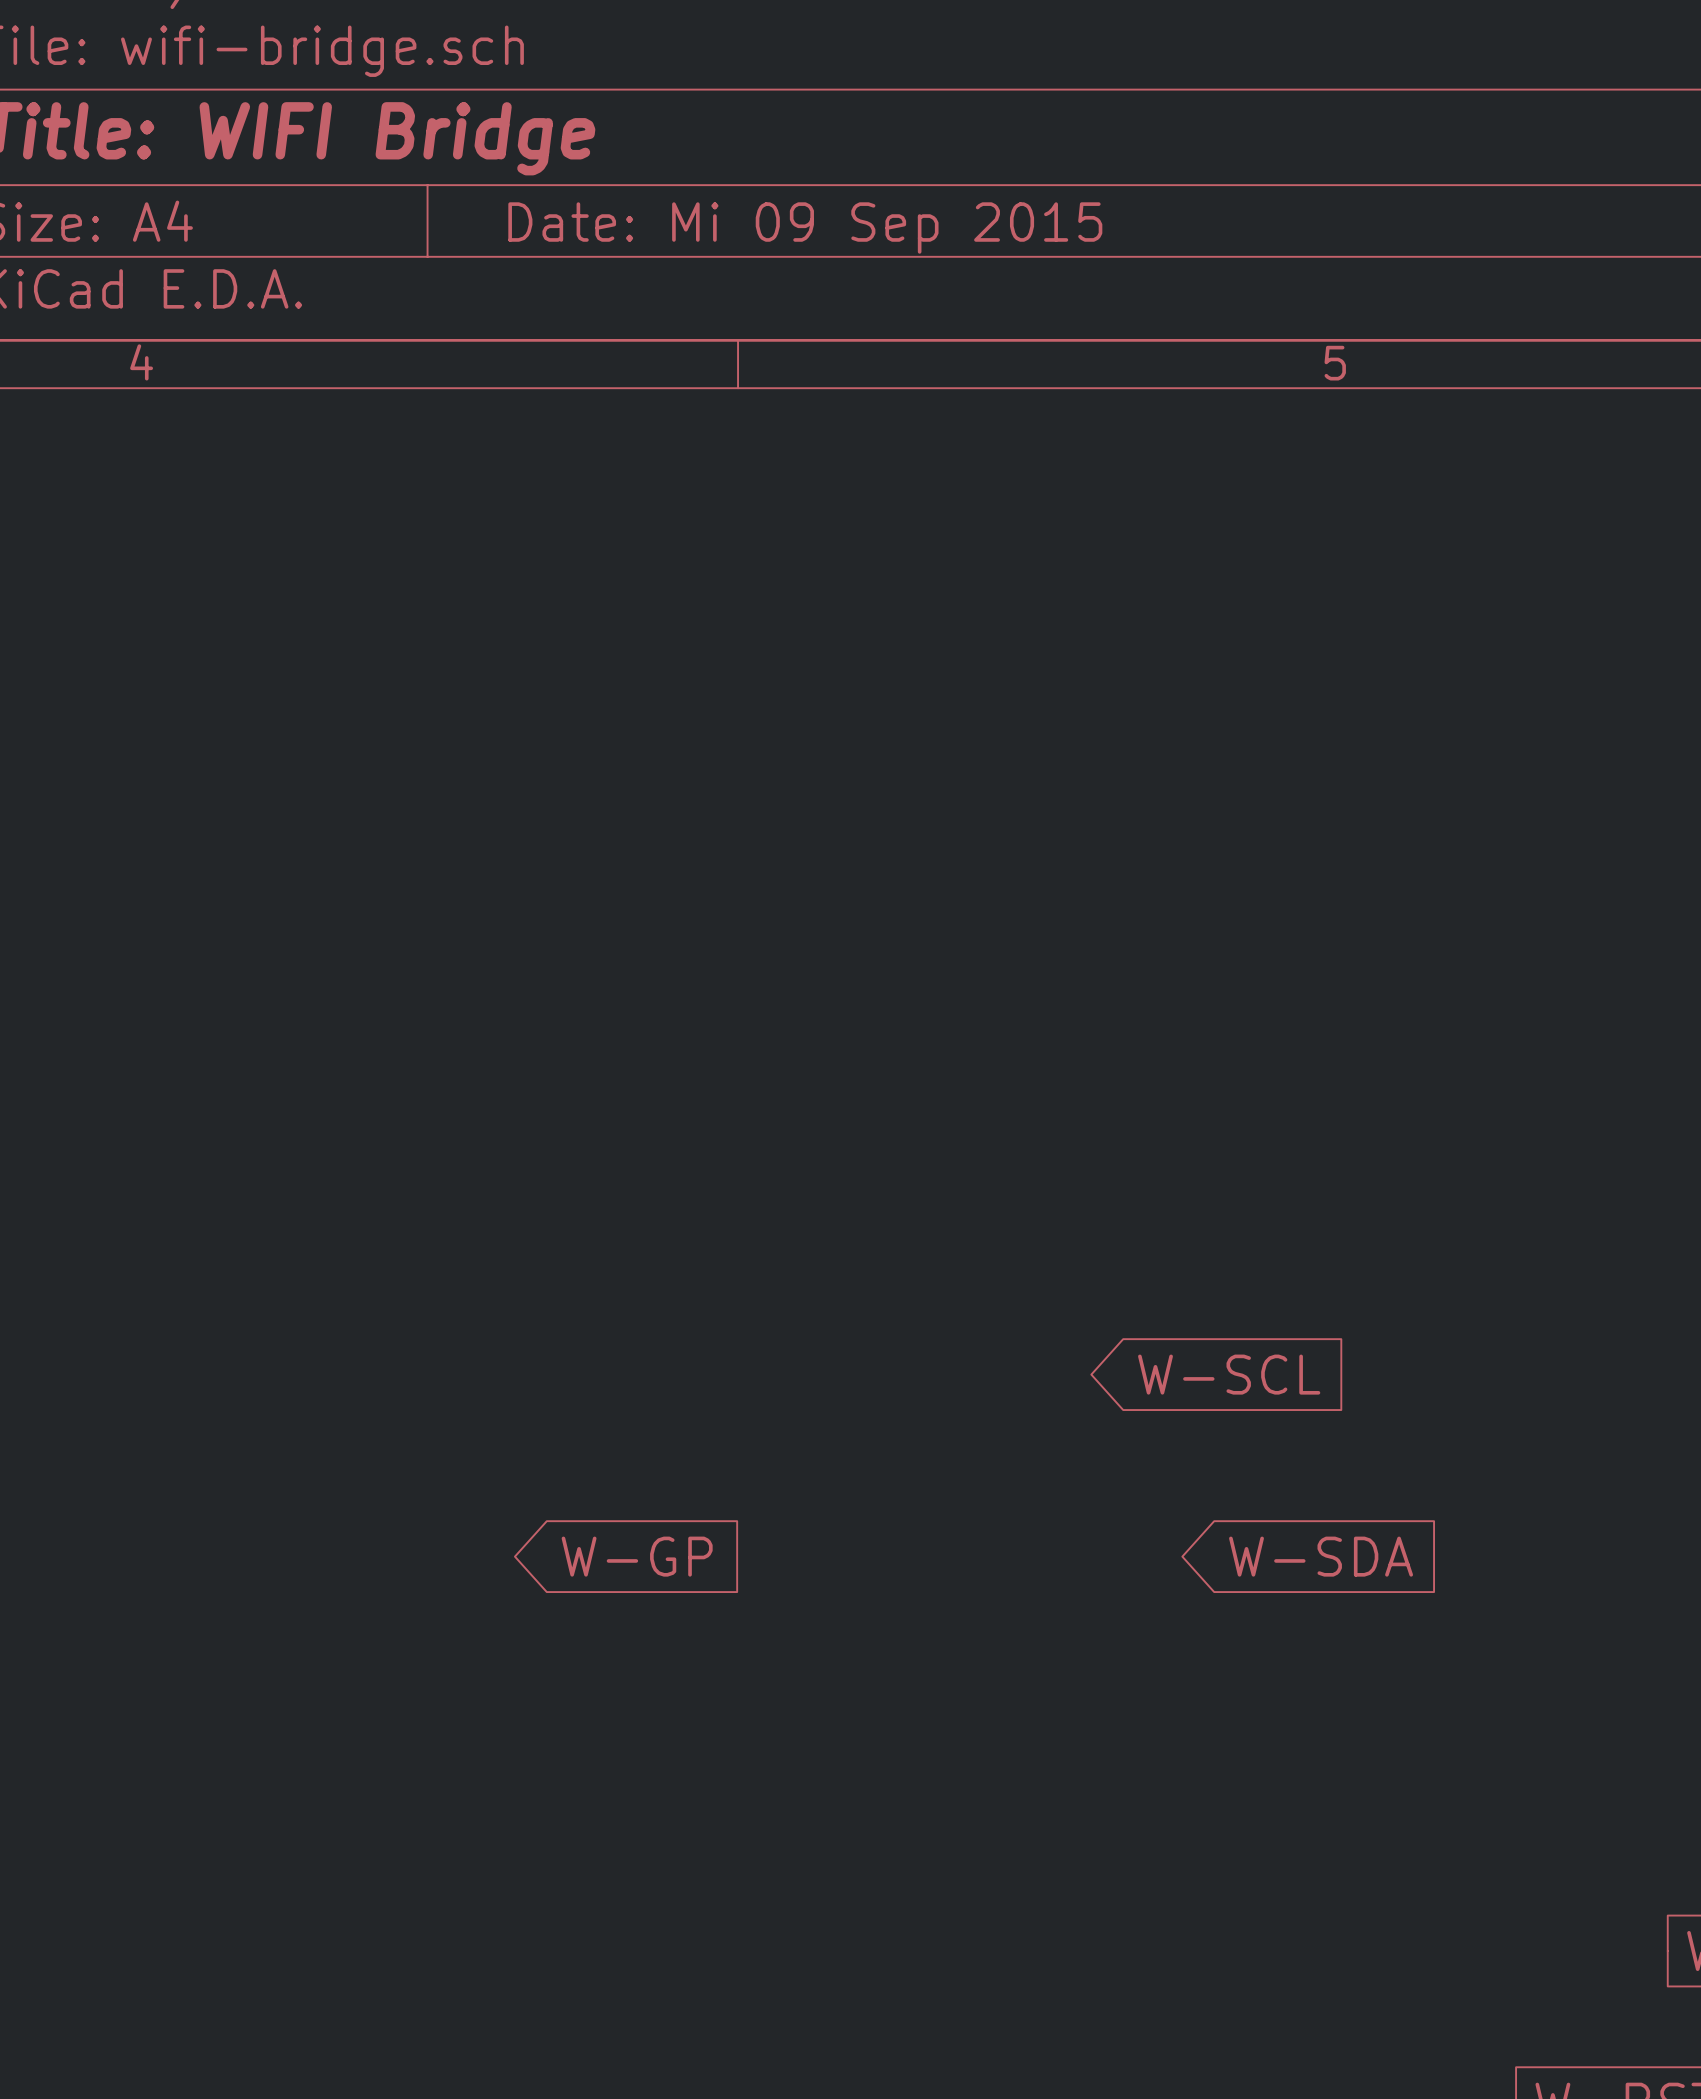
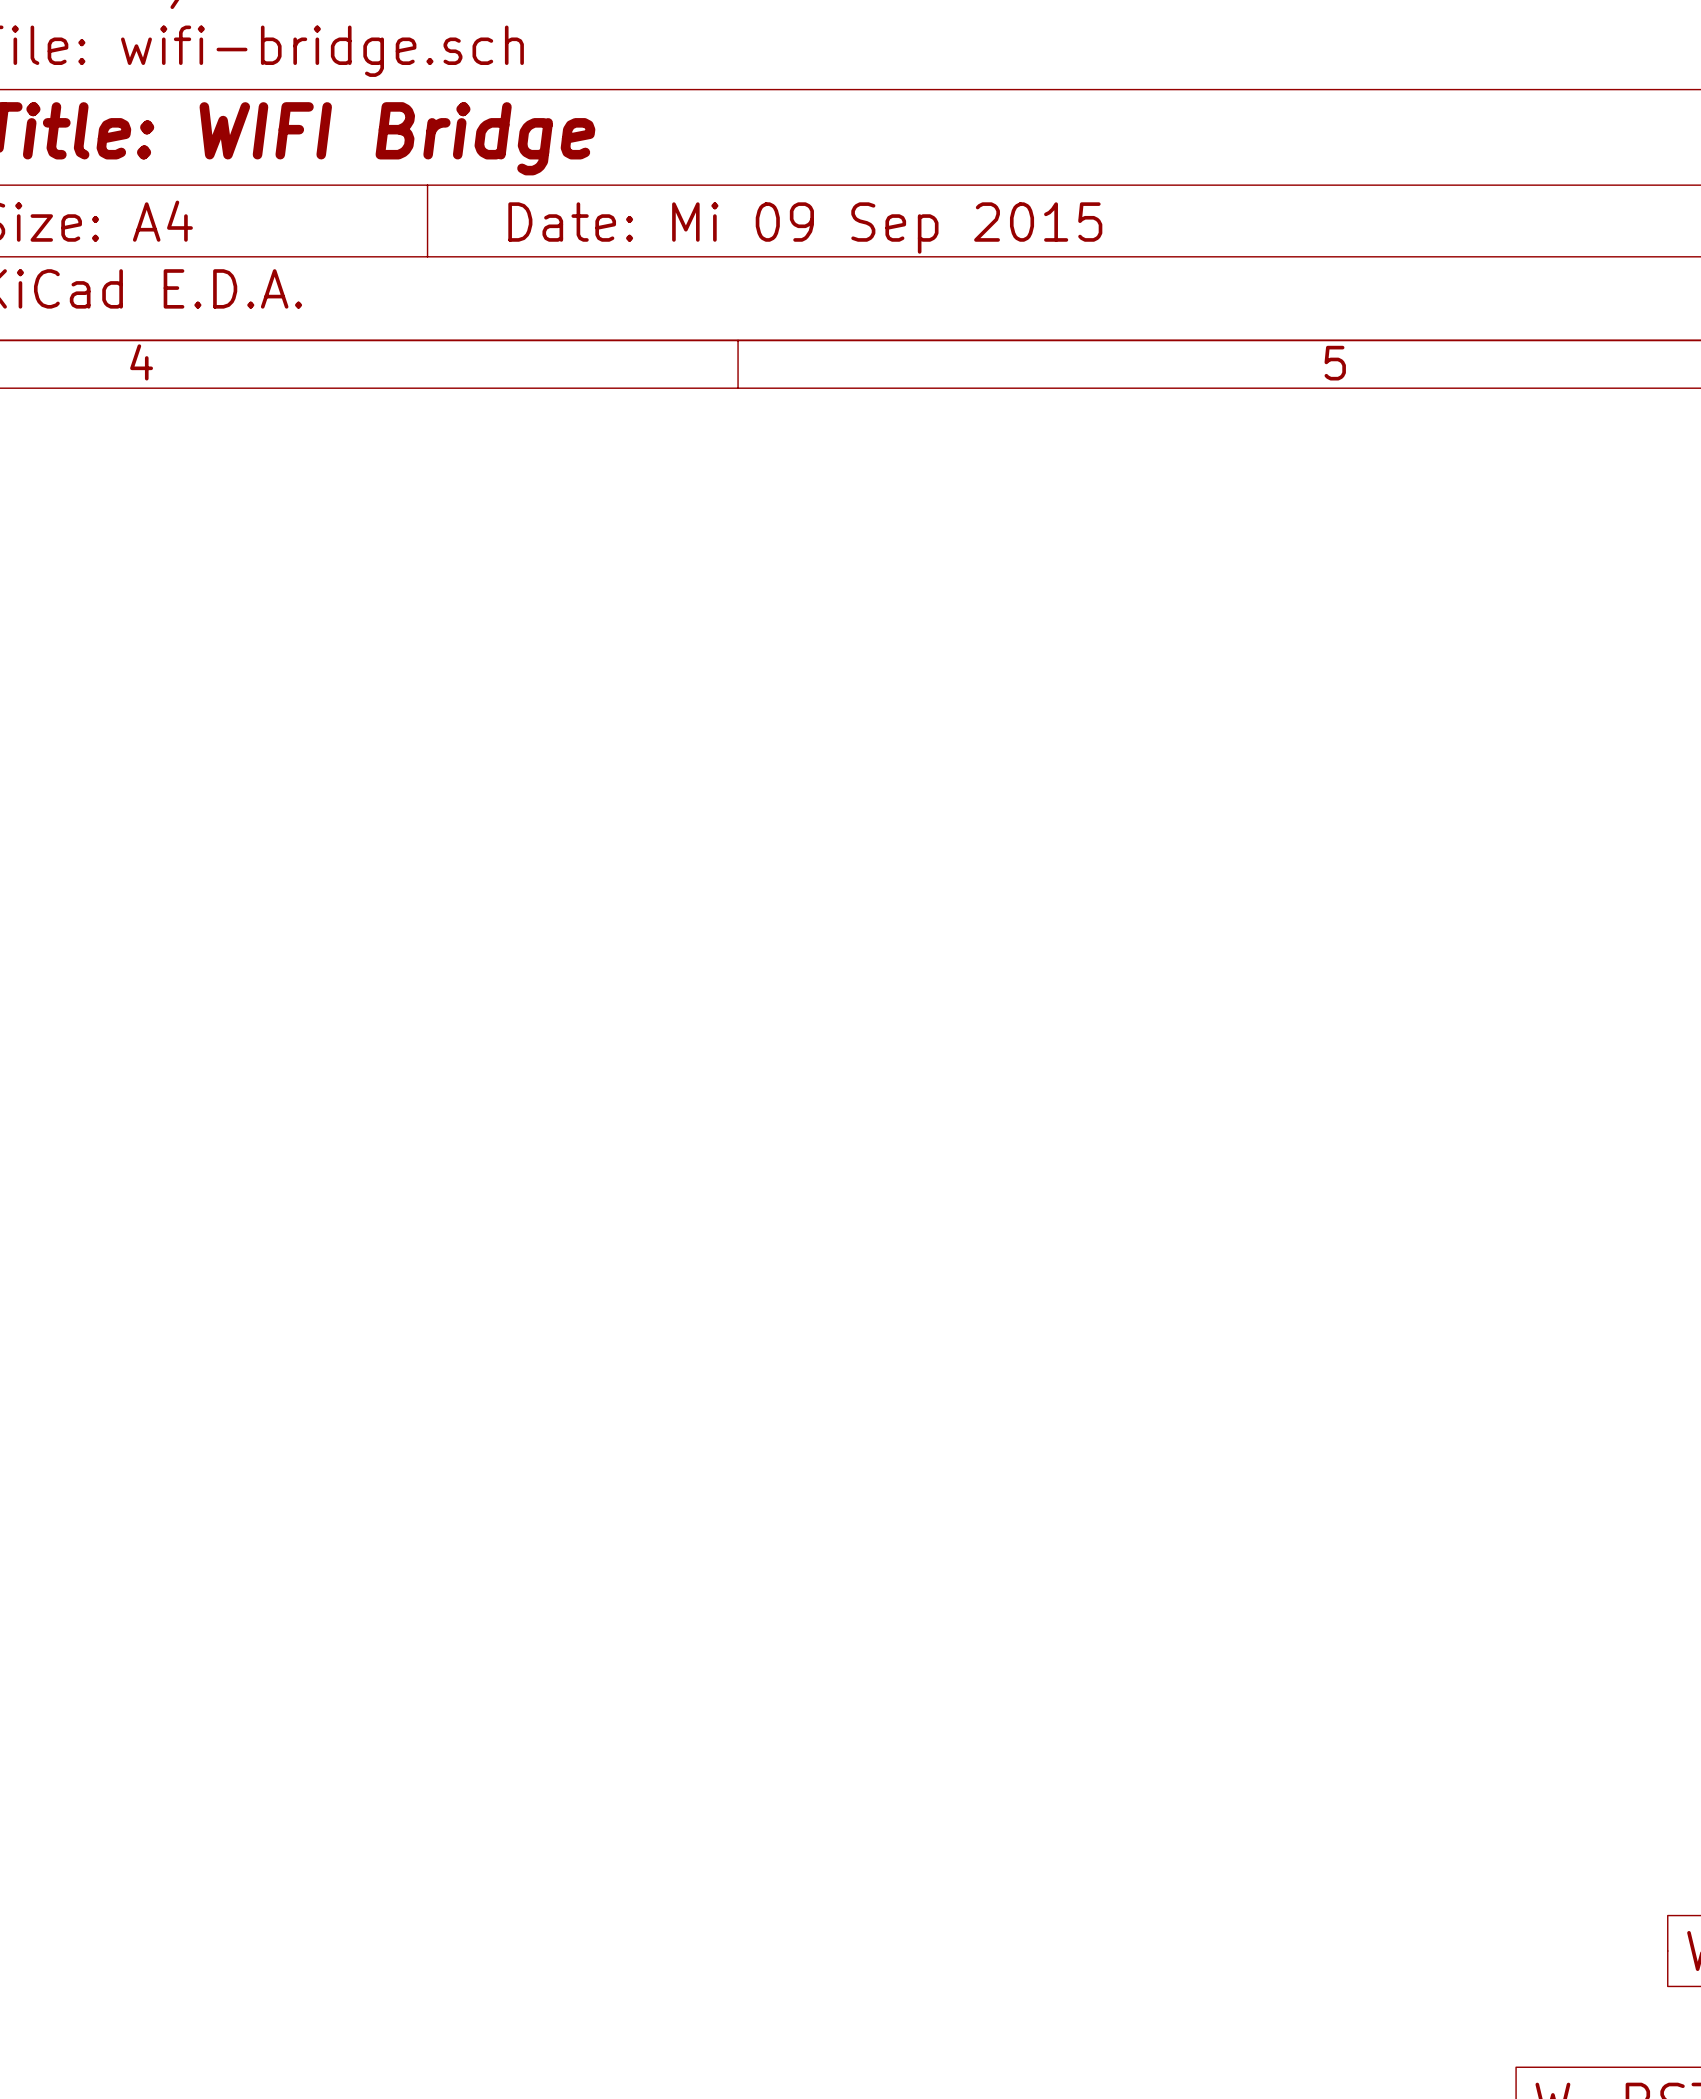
global label: W-SCL (1229, 1374) -> none
global label: W-GP (637, 1556) -> none
global label: W-SDA (1321, 1556) -> none

